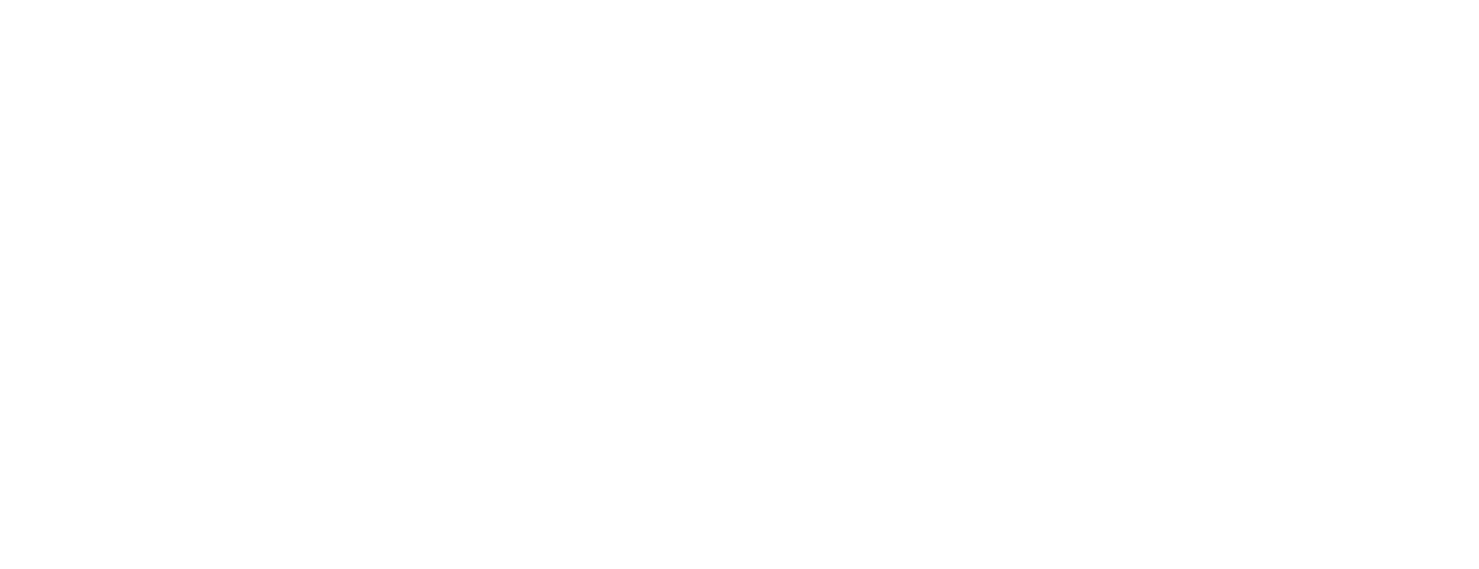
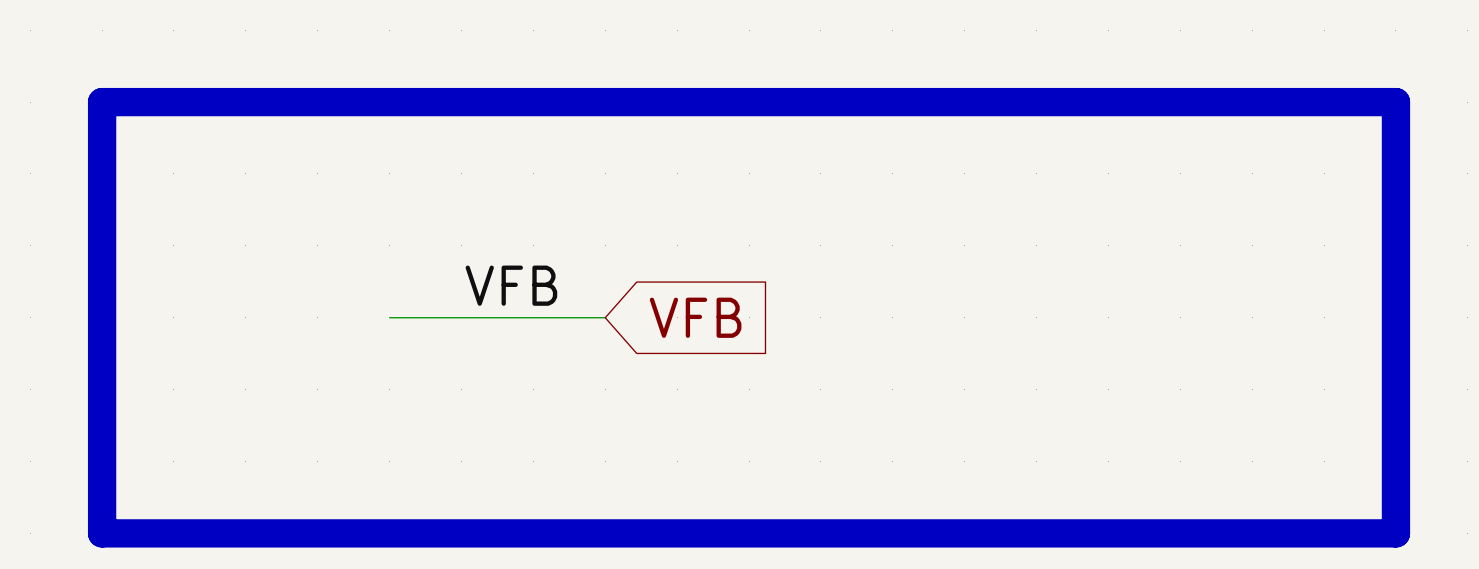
line: none -> (102, 102) (1395, 102) (1395, 533) (102, 533) (102, 102)
label: none -> VFB (511, 285)
wire: none -> (389, 317) (605, 317)
global label: none -> VFB (695, 317)

